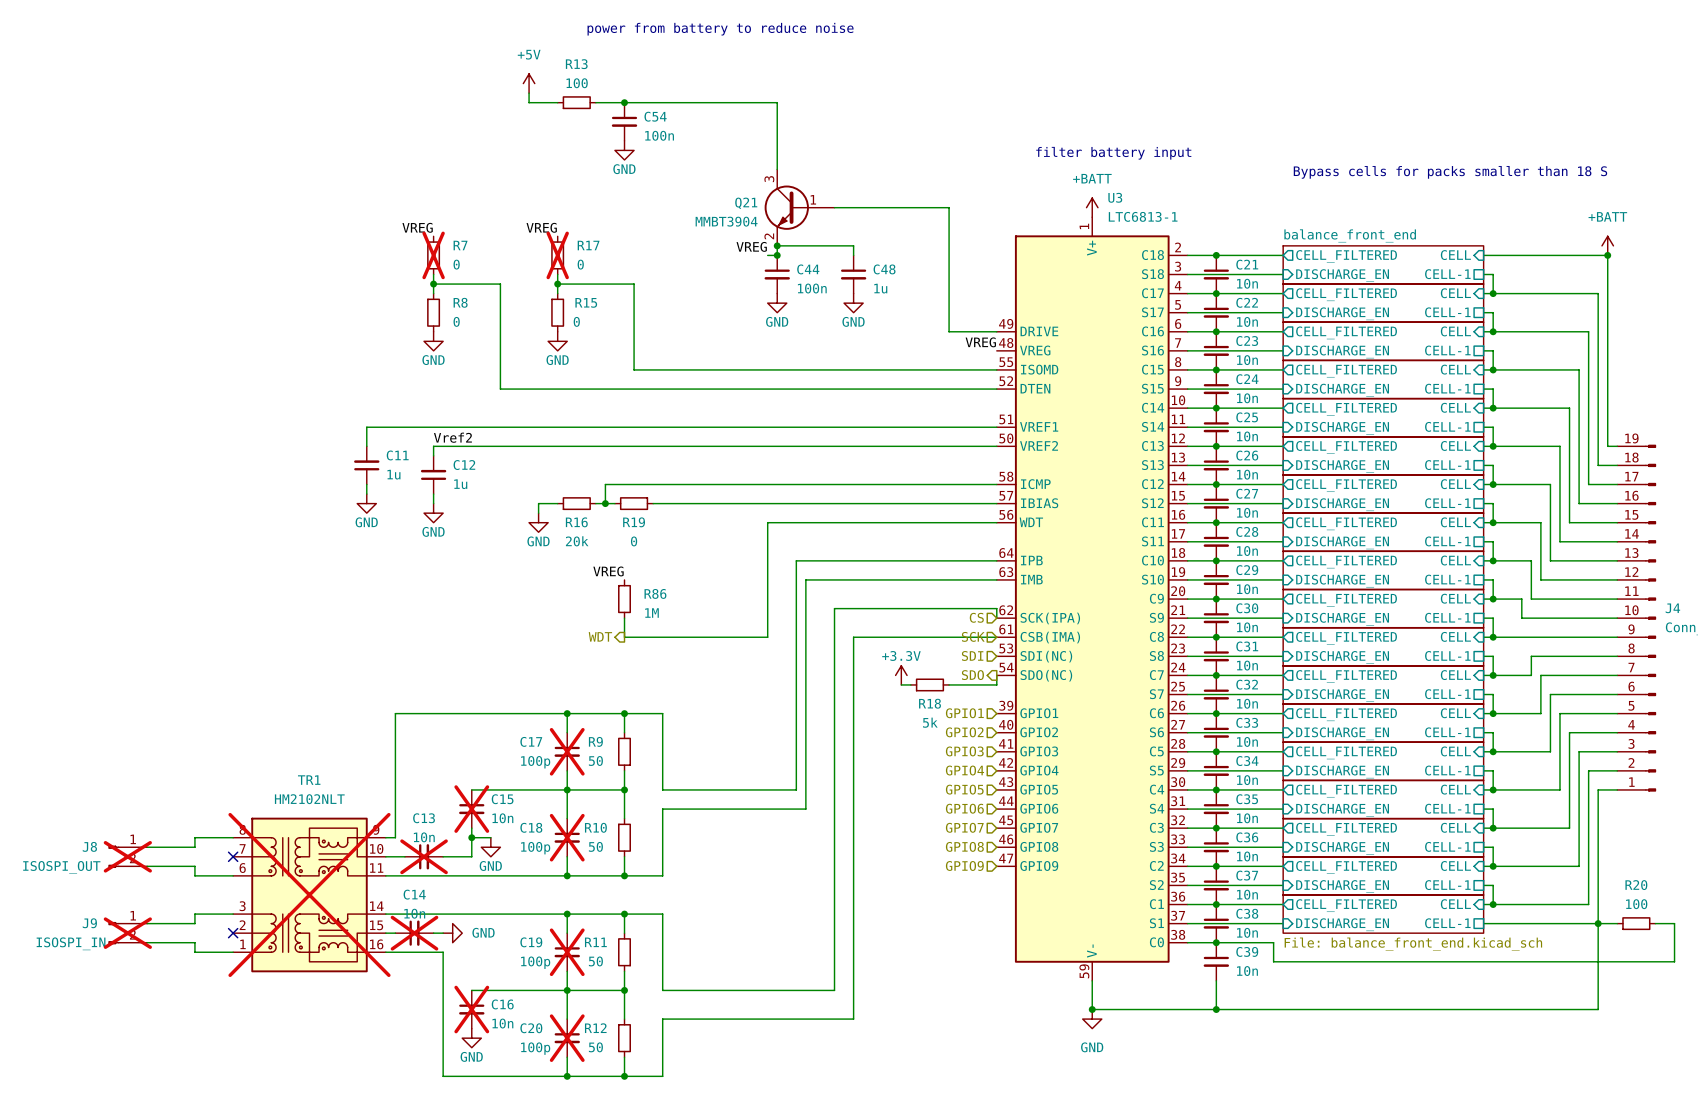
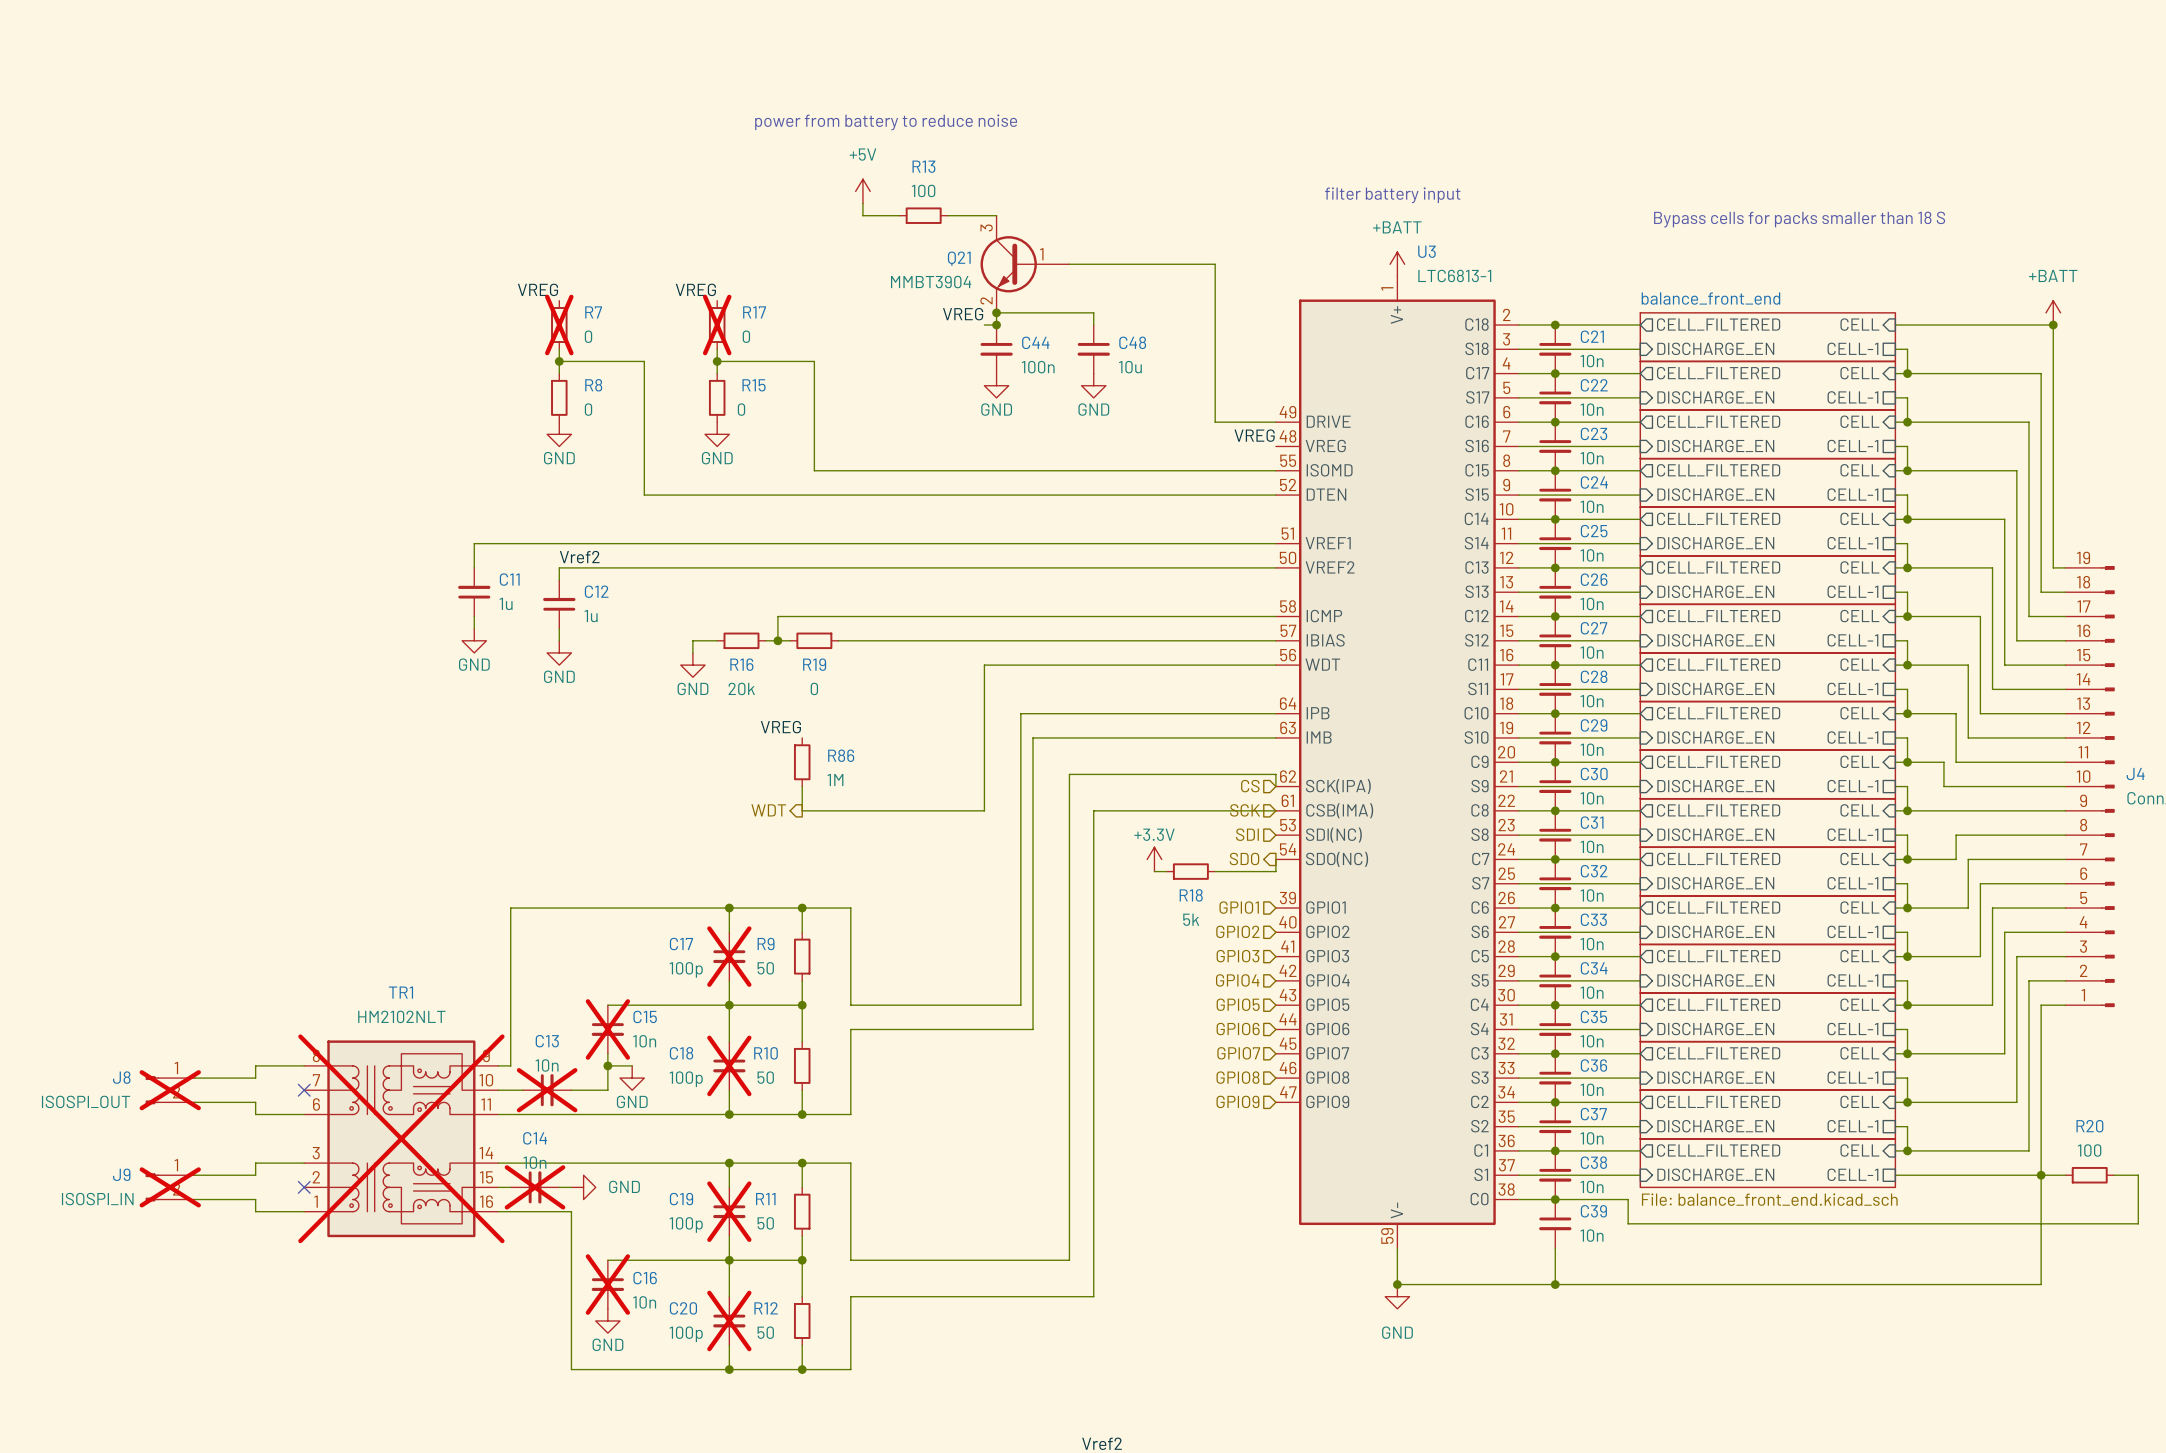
text position: power from battery to reduce noise (720, 29) -> power from battery to reduce noise (886, 122)
power symbol position: +5V (529, 83) -> +5V (862, 191)
wire: (529, 93) (529, 102) (557, 102) -> (862, 203) (862, 215) (899, 215)
R13 position: (576, 102) -> (923, 215)
wire: (595, 102) (777, 102) (777, 169) -> (947, 215) (996, 215)
junction: (624, 102) -> none
C54: 100n (624, 121) -> none
power symbol: GND (624, 150) -> none
C48 value: 1u (880, 288) -> 10u (1130, 367)

